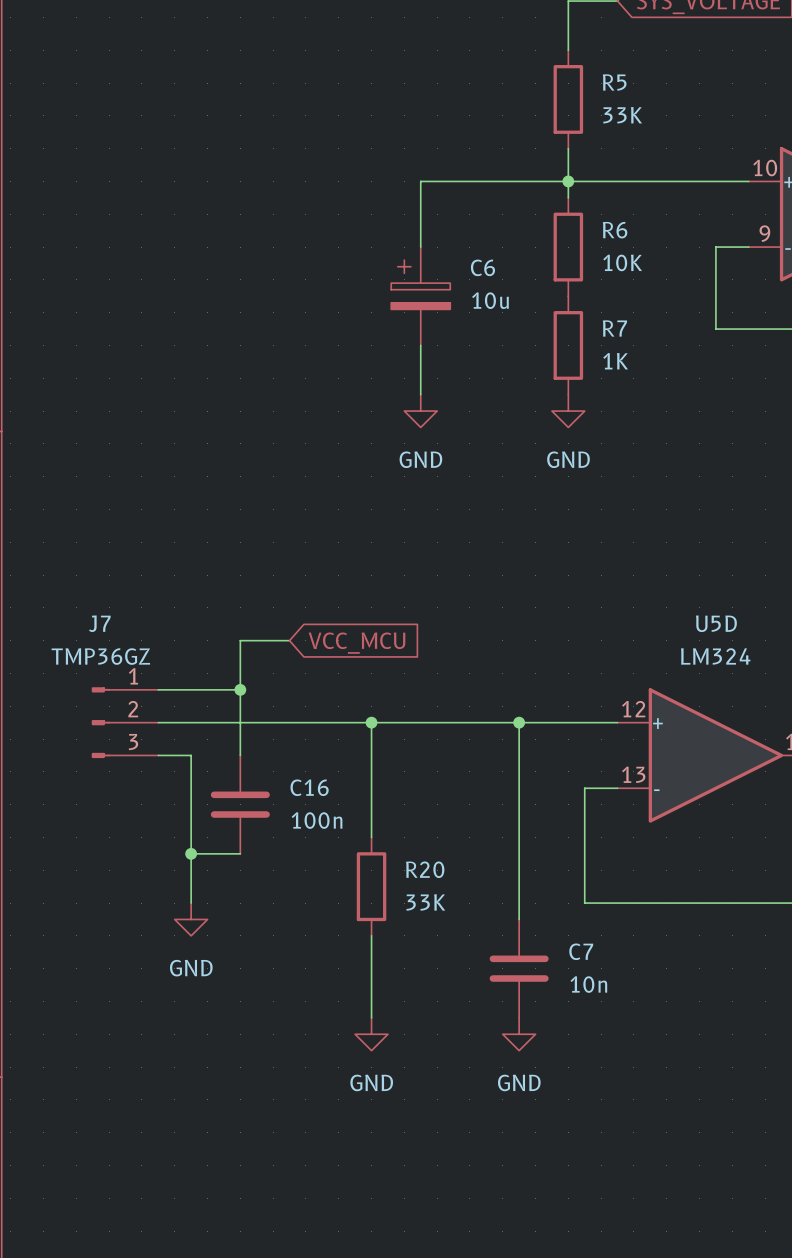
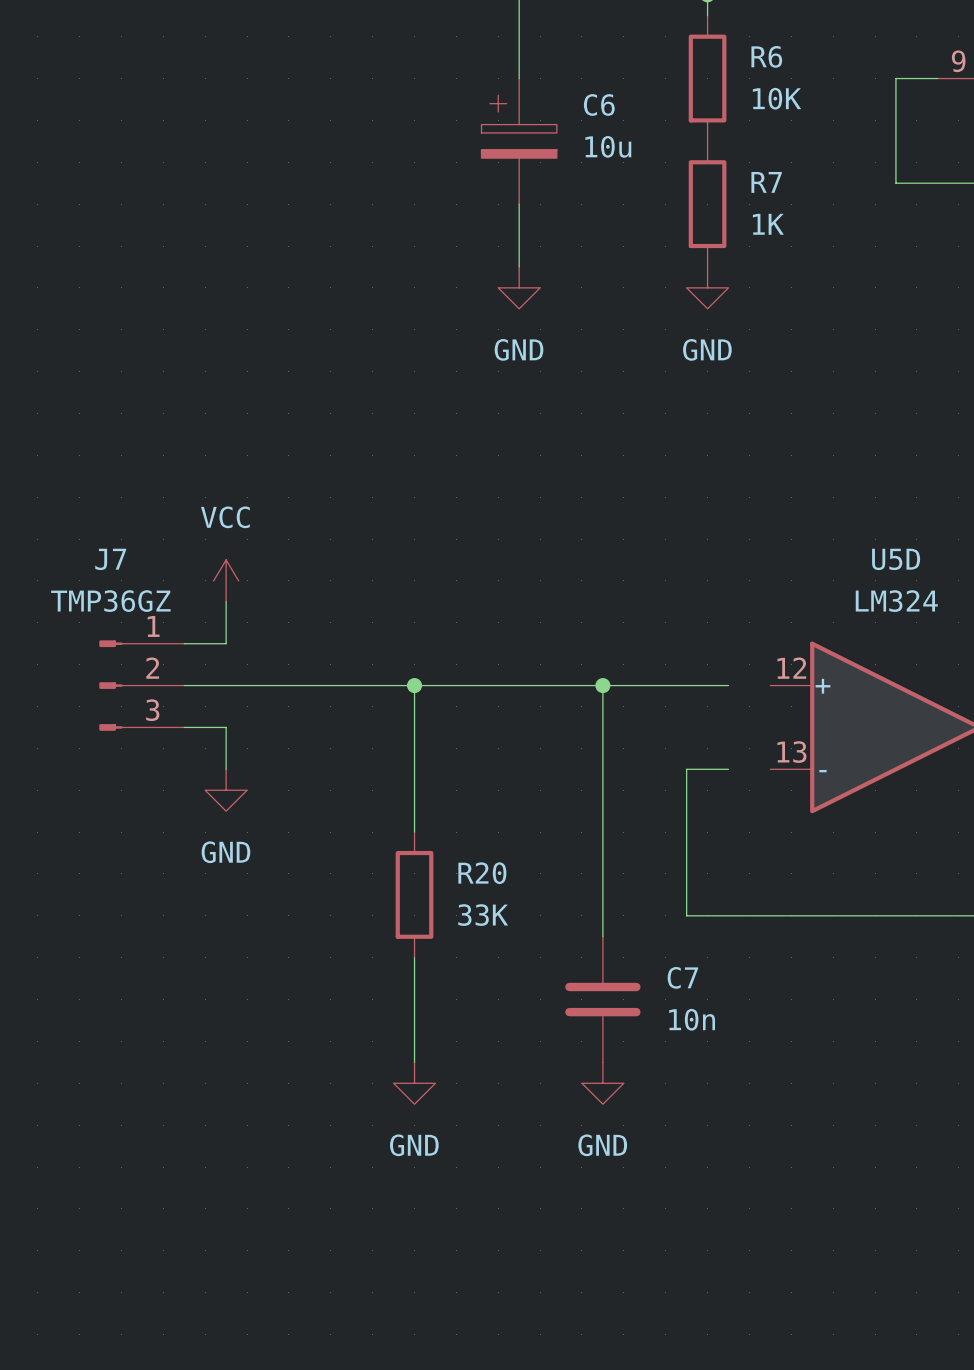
power symbol: none -> VCC (226, 580)
wire: (289, 640) (240, 640) (240, 755) -> none
global label: VCC_MCU (357, 643) -> none
wire: (191, 689) (240, 689) -> (226, 643) (226, 601)
junction: (240, 689) -> none
wire: (371, 722) (371, 837) -> (414, 685) (414, 832)
junction position: (371, 722) -> (414, 685)
wire: (519, 722) (519, 919) -> (602, 685) (602, 936)
junction position: (519, 722) -> (602, 685)
wire: (584, 722) (617, 722) -> none
wire: (191, 788) (191, 903) -> none
wire: (617, 788) (584, 788) (584, 903) -> (728, 769) (686, 769) (686, 915) (728, 915)
power symbol: none -> GND (226, 790)
C16: 100n (240, 804) -> none
wire: (191, 853) (240, 853) -> none
junction: (191, 853) -> none
R20 position: (371, 886) -> (414, 894)
power symbol: GND (191, 919) -> none
wire: (371, 935) (371, 1017) -> (414, 957) (414, 1062)
C7 position: (519, 968) -> (602, 999)
power symbol position: GND (371, 1034) -> GND (414, 1083)
power symbol position: GND (519, 1034) -> GND (602, 1083)

